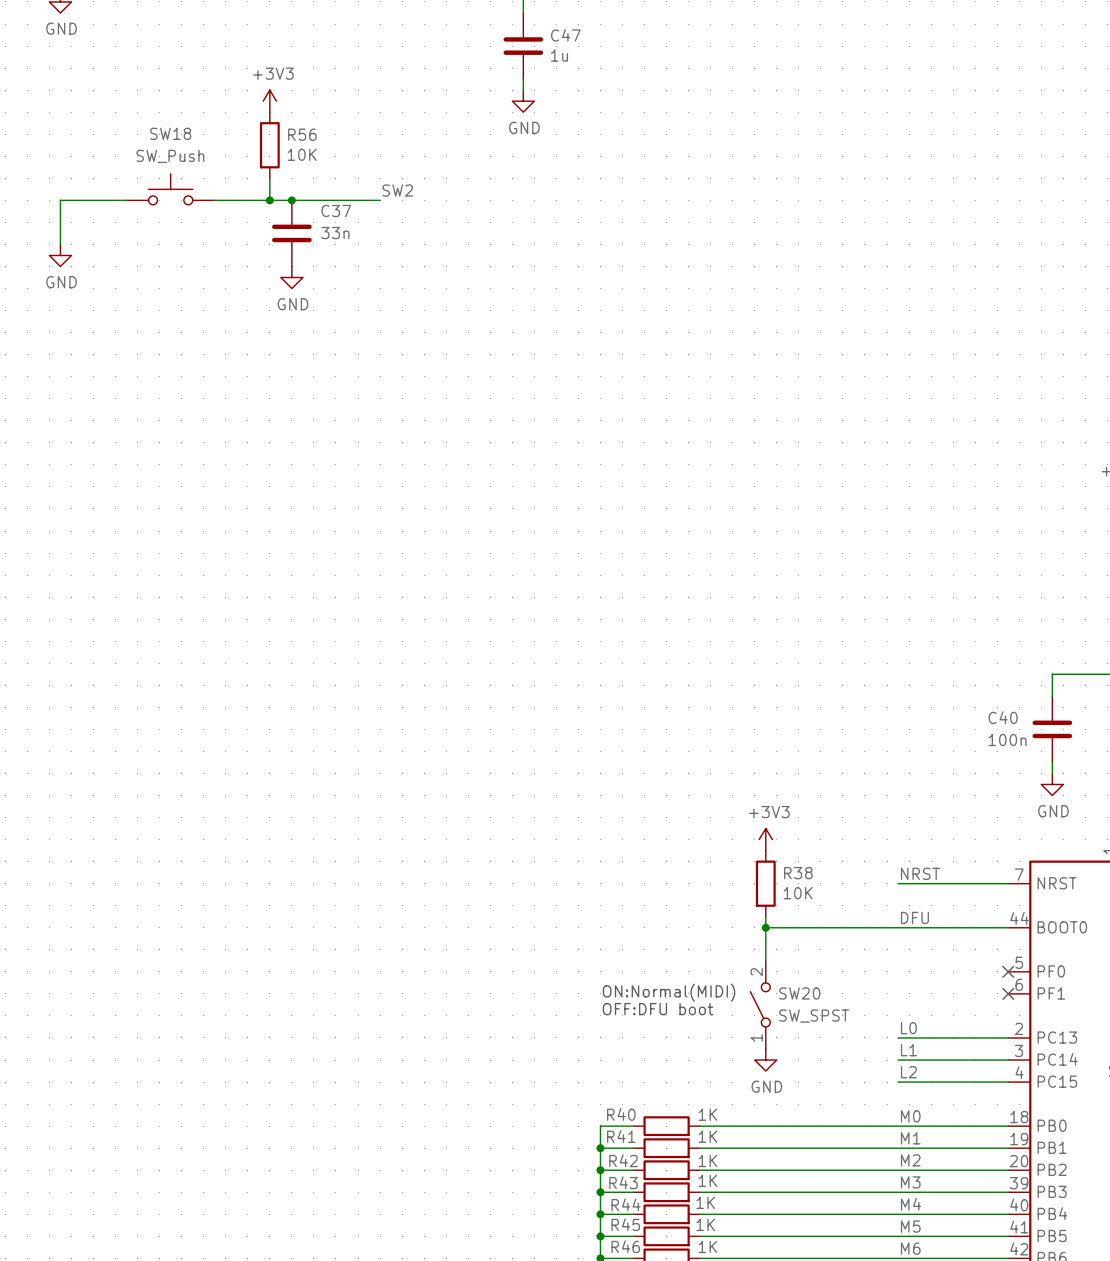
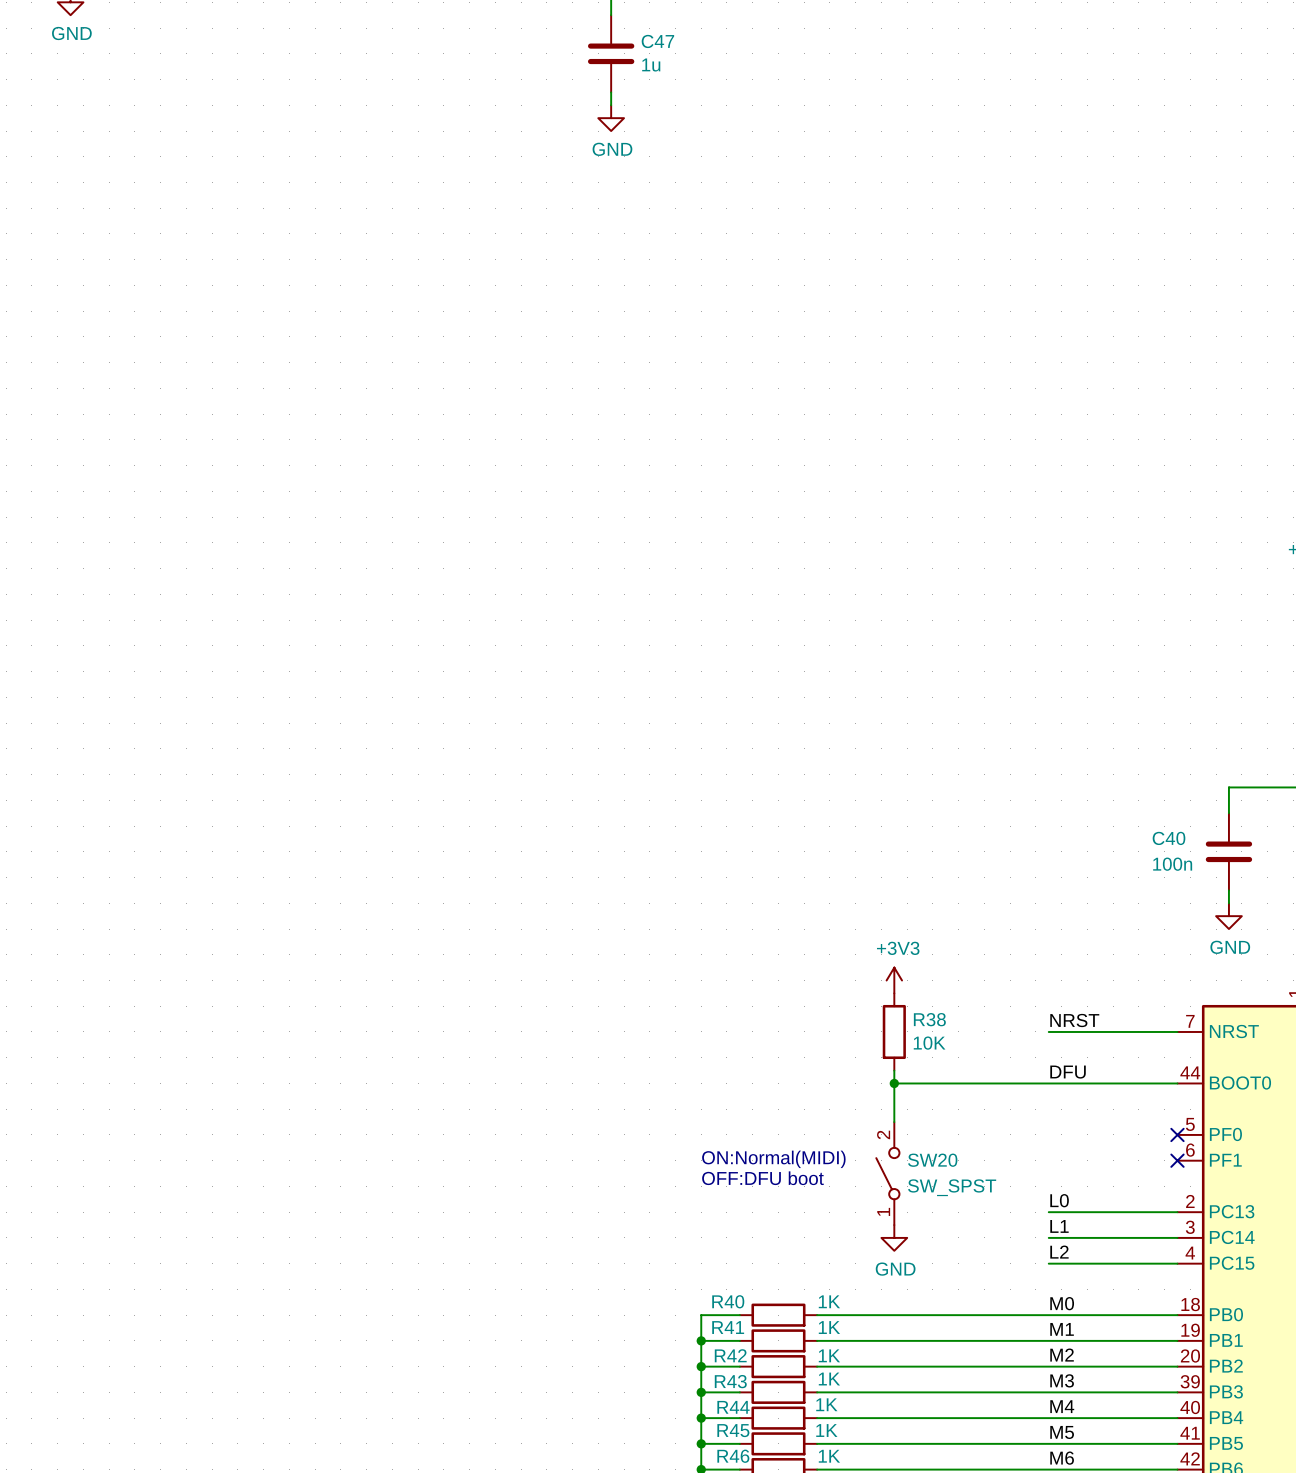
power symbol: +3V3 (269, 101) -> none
R56: 10K (269, 145) -> none
wire: (269, 178) (269, 200) -> none
SW18: SW_Push (170, 189) -> none
label: SW2 (397, 190) -> none
wire: (126, 200) (60, 200) (60, 244) -> none
wire: (214, 200) (380, 200) -> none
junction: (269, 200) -> none
junction: (291, 200) -> none
C37: 33n (291, 233) -> none
power symbol: GND (60, 255) -> none
power symbol: GND (291, 277) -> none

